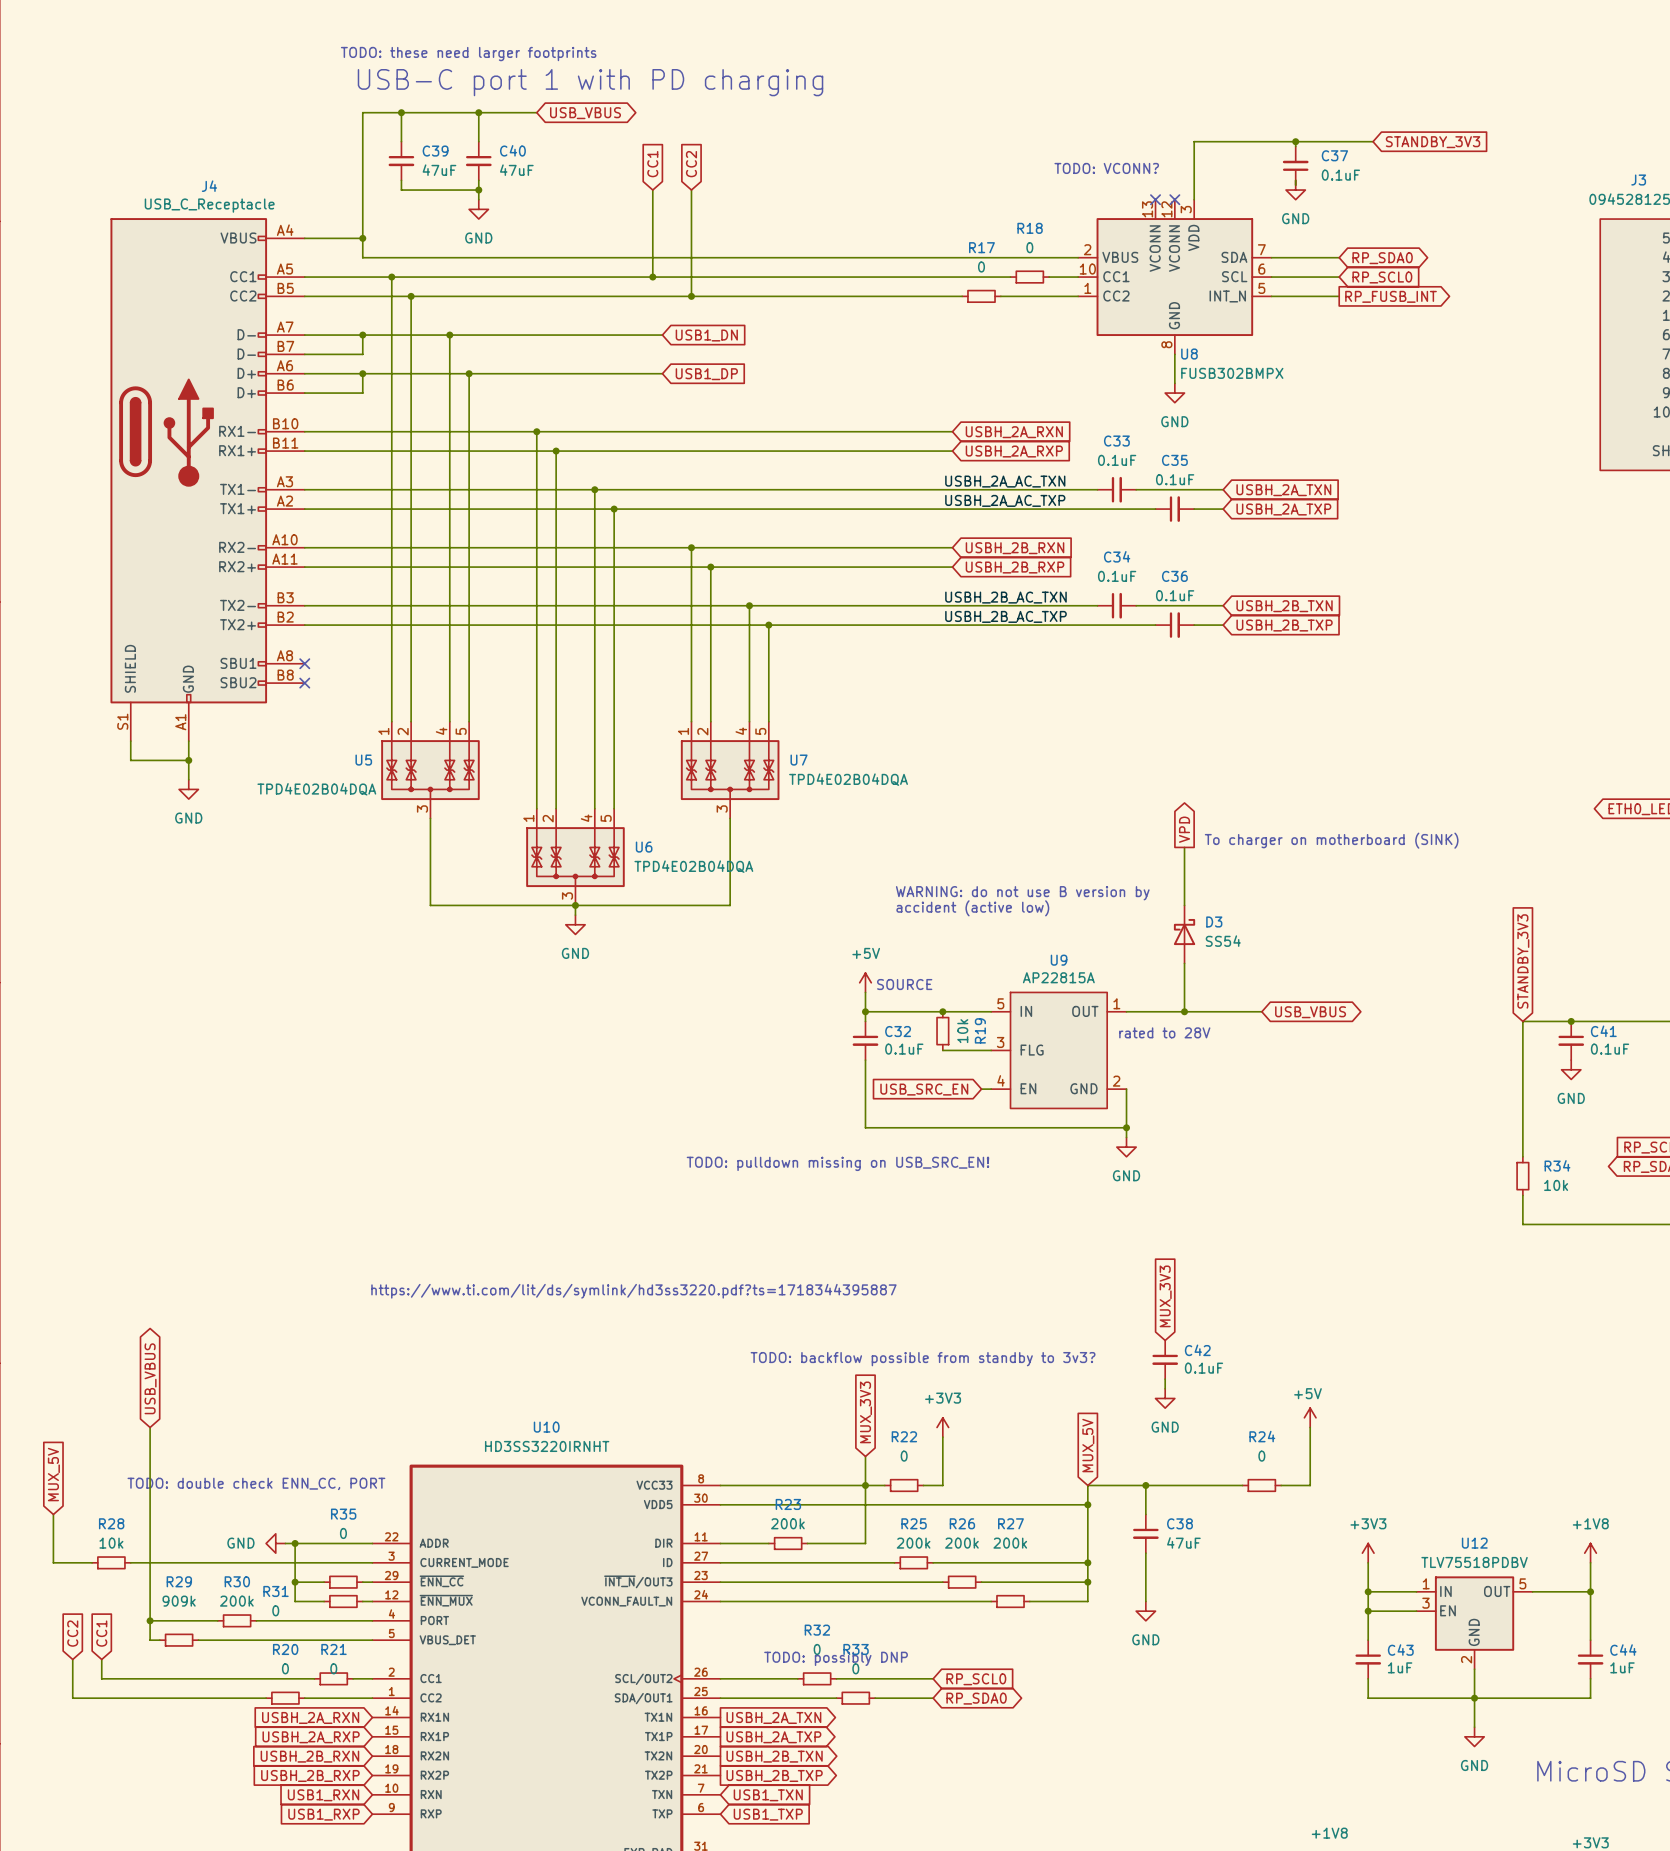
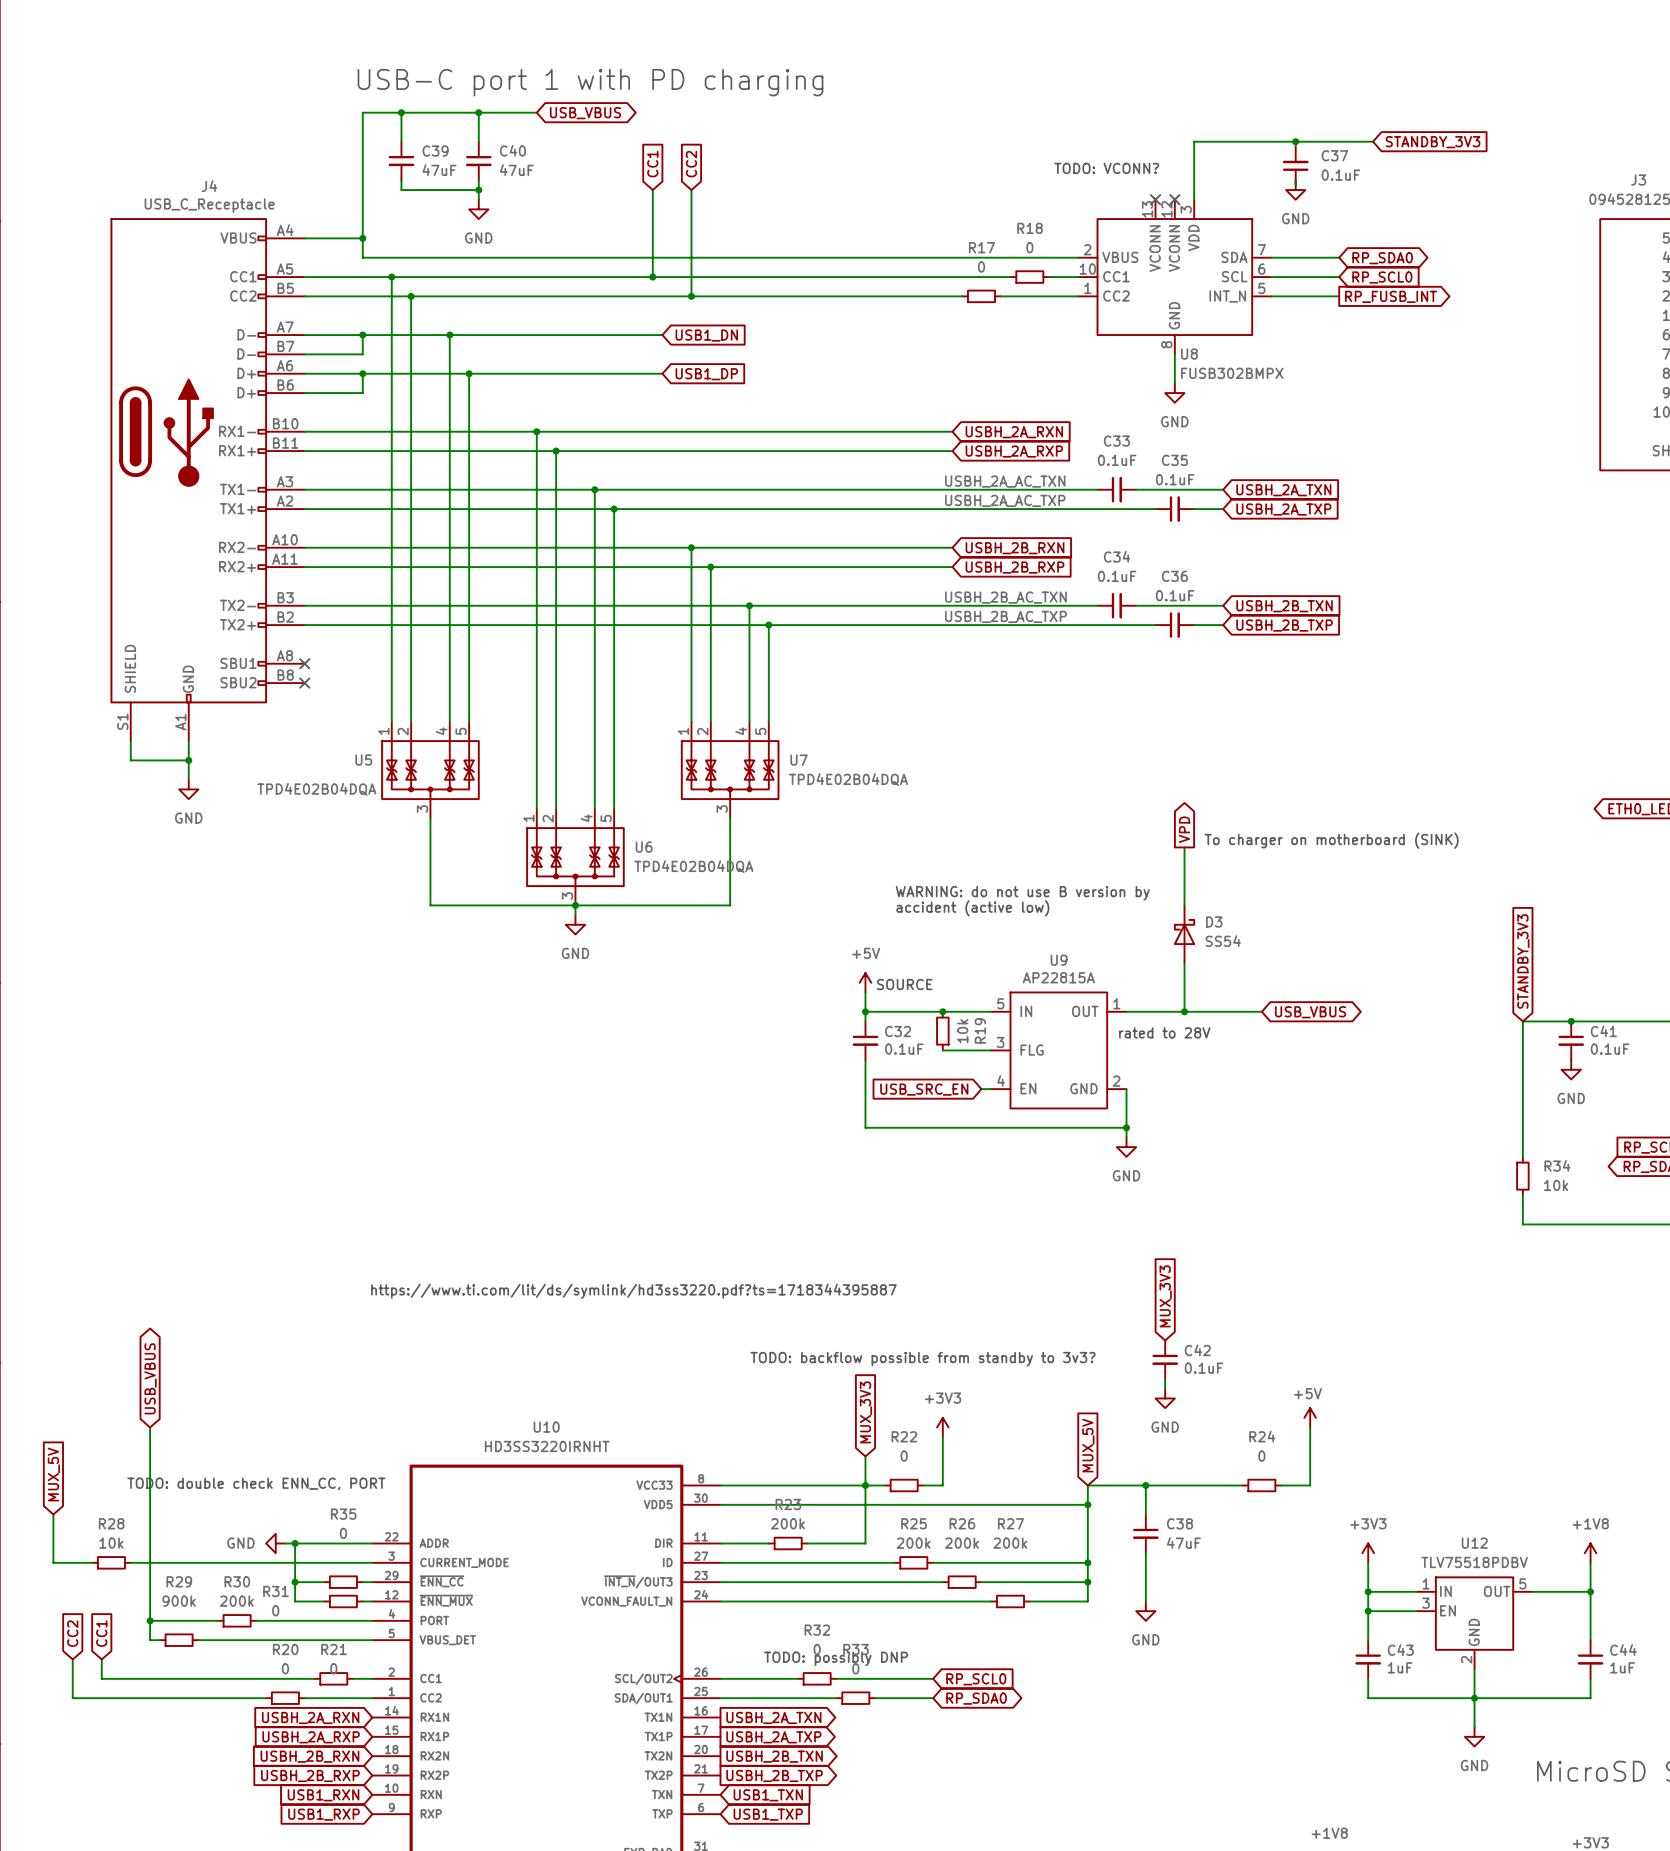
text: TODO: these need larger footprints (468, 54) -> none
text: TODO: pulldown missing on USB_SRC_EN! (837, 1163) -> none
R29 value: 909k (179, 1601) -> 900k (179, 1601)

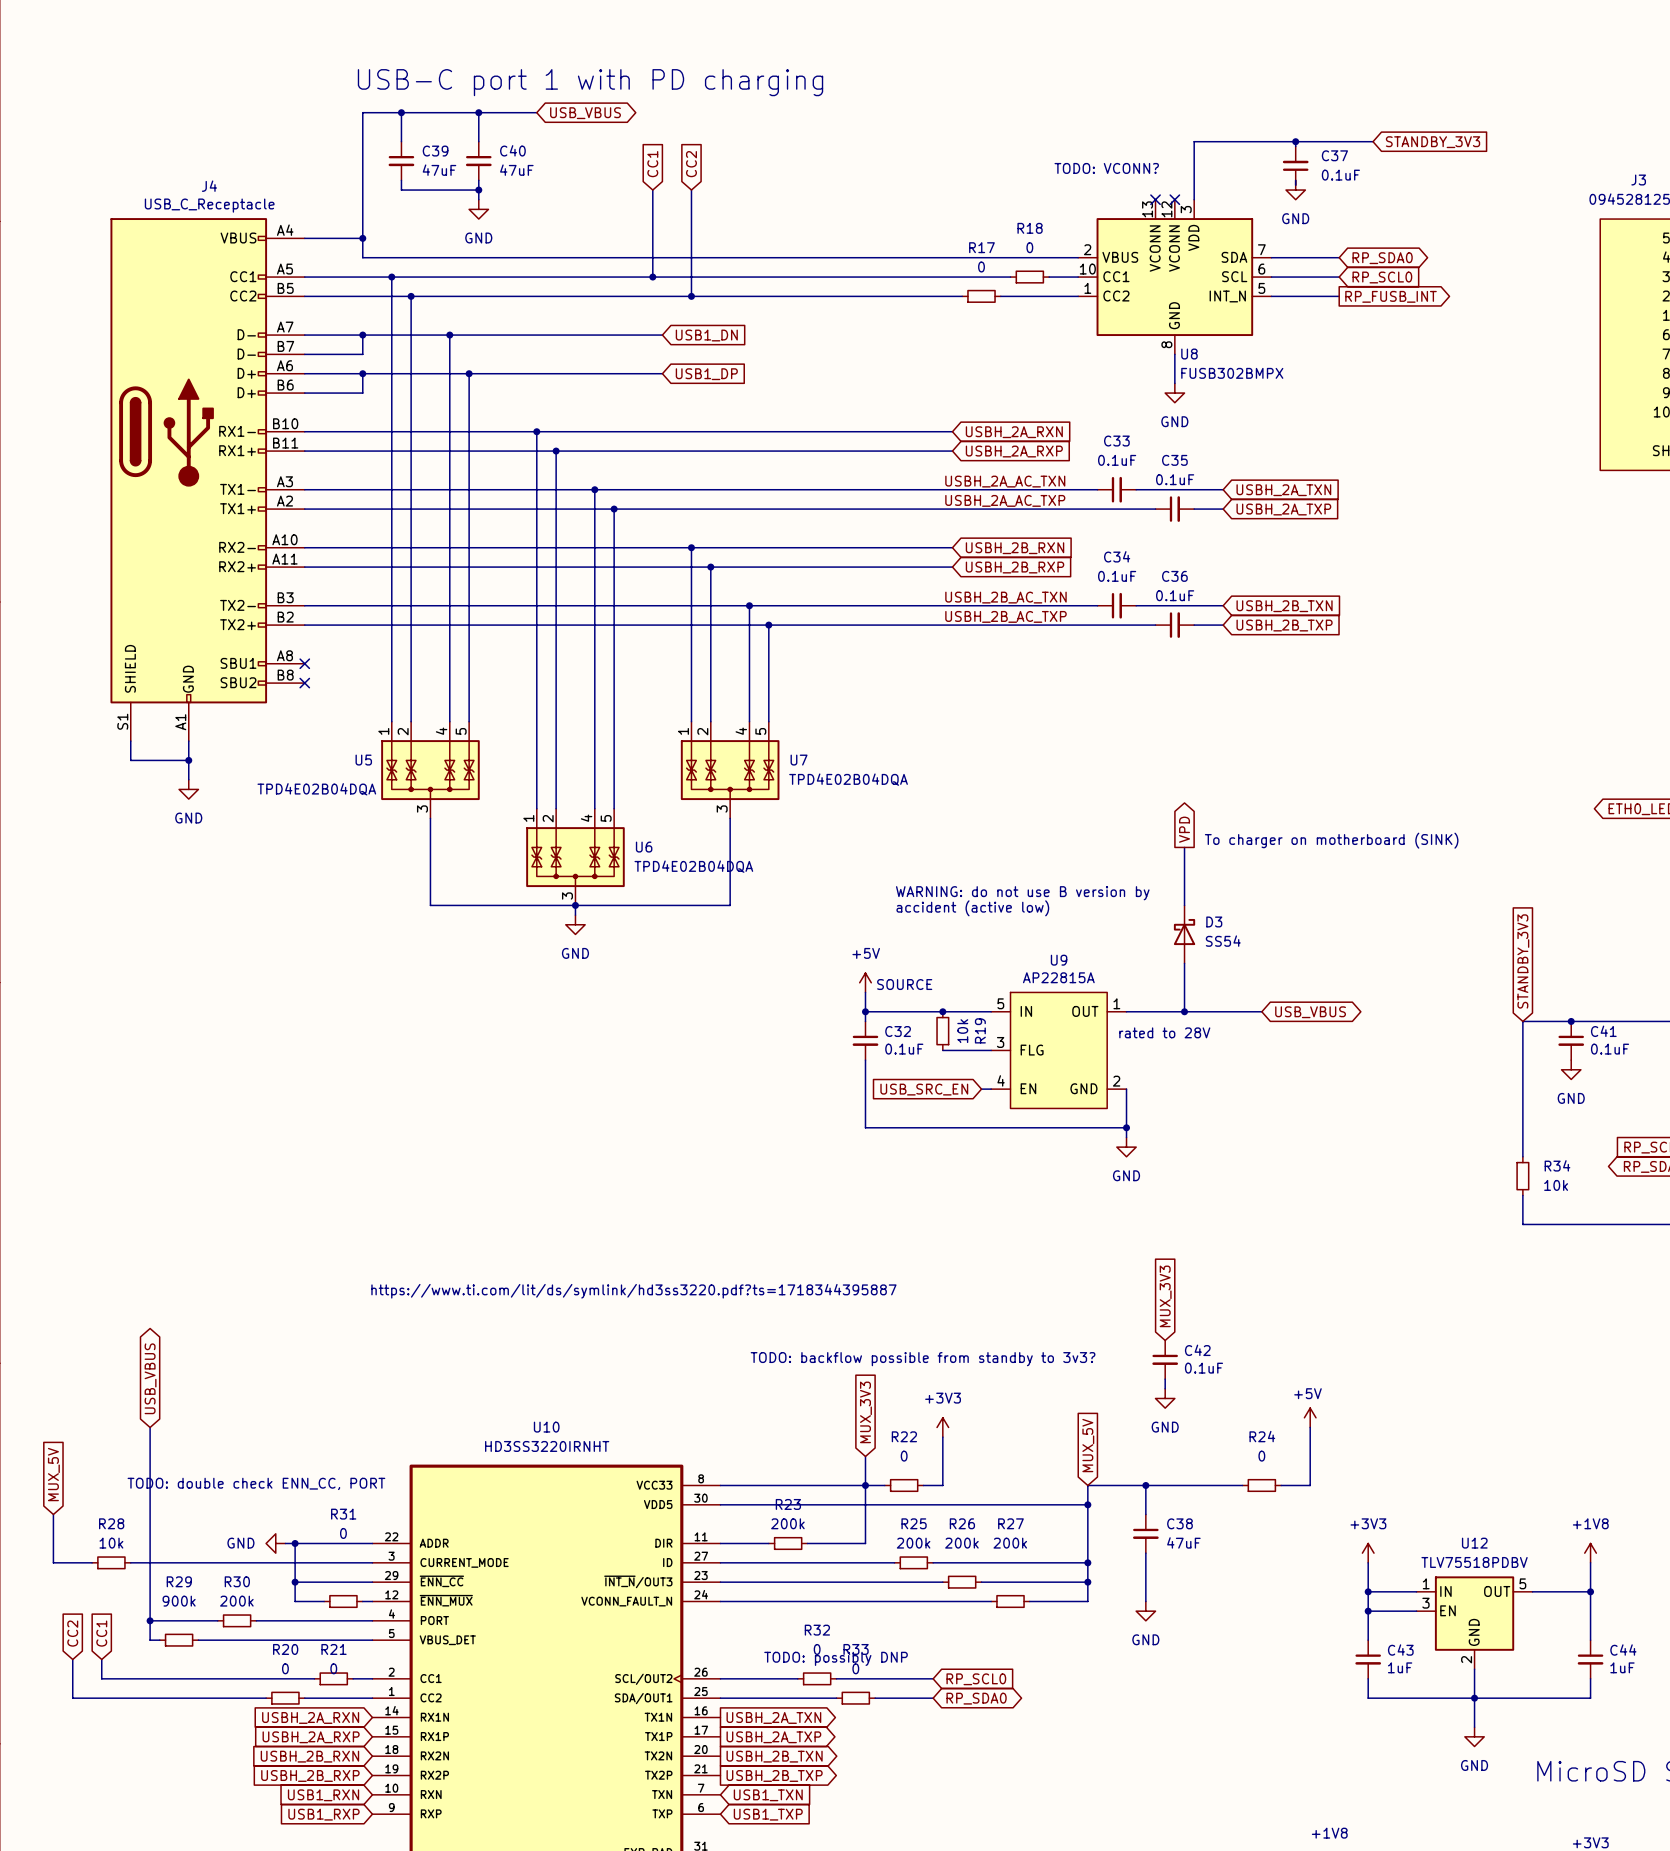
wire: none -> (324, 1582) (362, 1582)
R35: 0 (343, 1582) -> none
R31 name position: R31 (276, 1591) -> R31 (343, 1514)
R31 value position: 0 (275, 1610) -> 0 (343, 1533)

